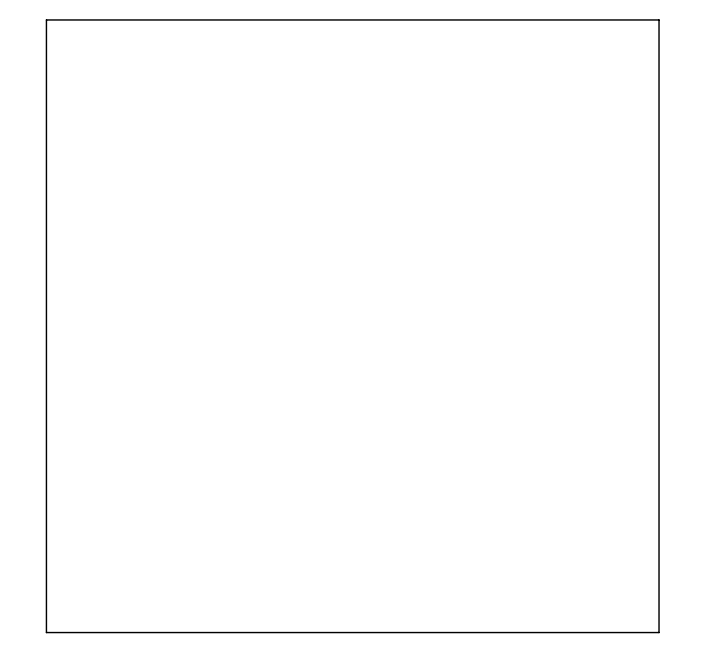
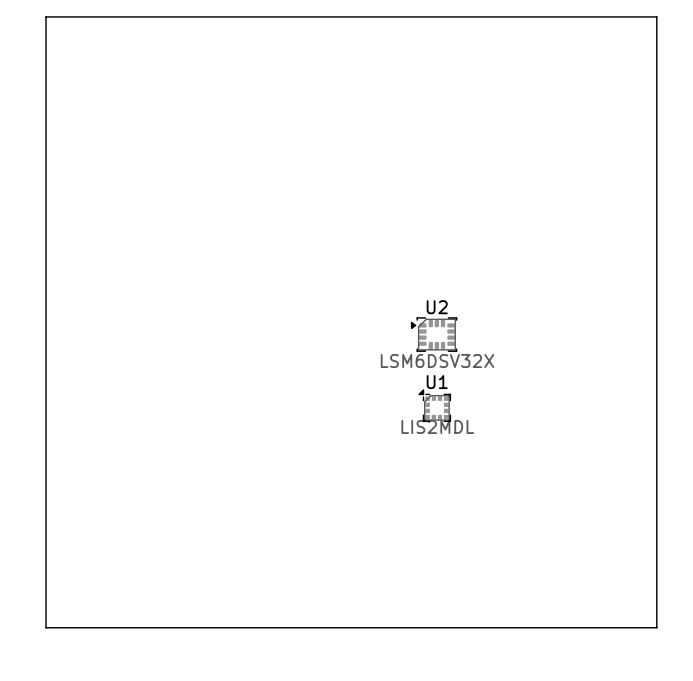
U2: none -> LSM6DSV32X (434, 334)
U1: none -> LIS2MDL (434, 405)

